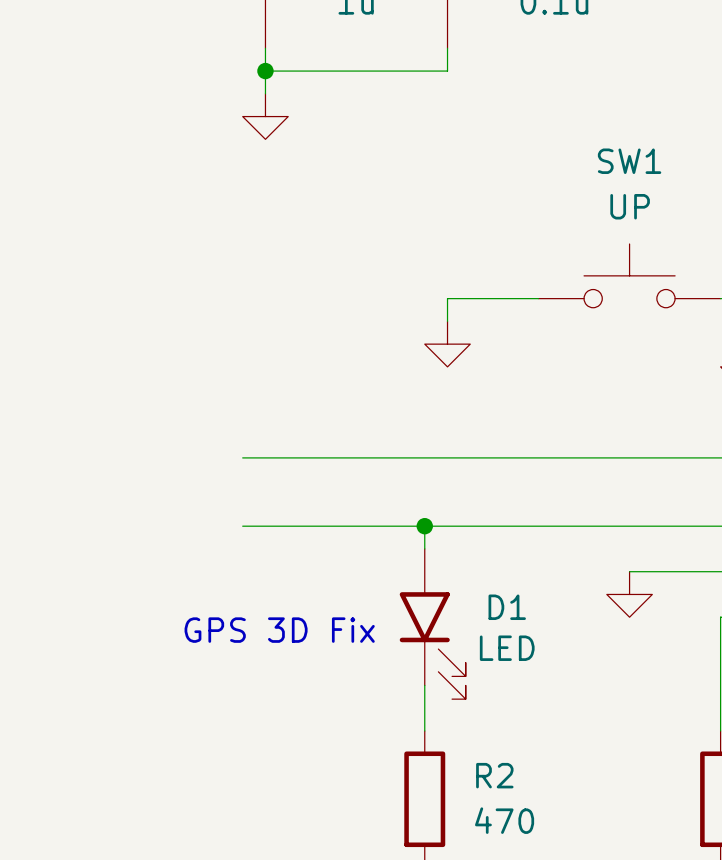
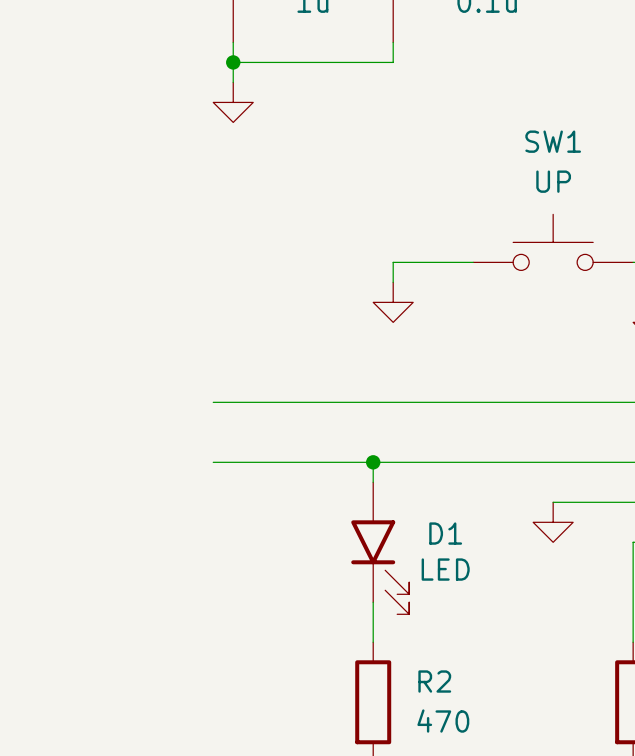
text: GPS 3D Fix (279, 630) -> none

